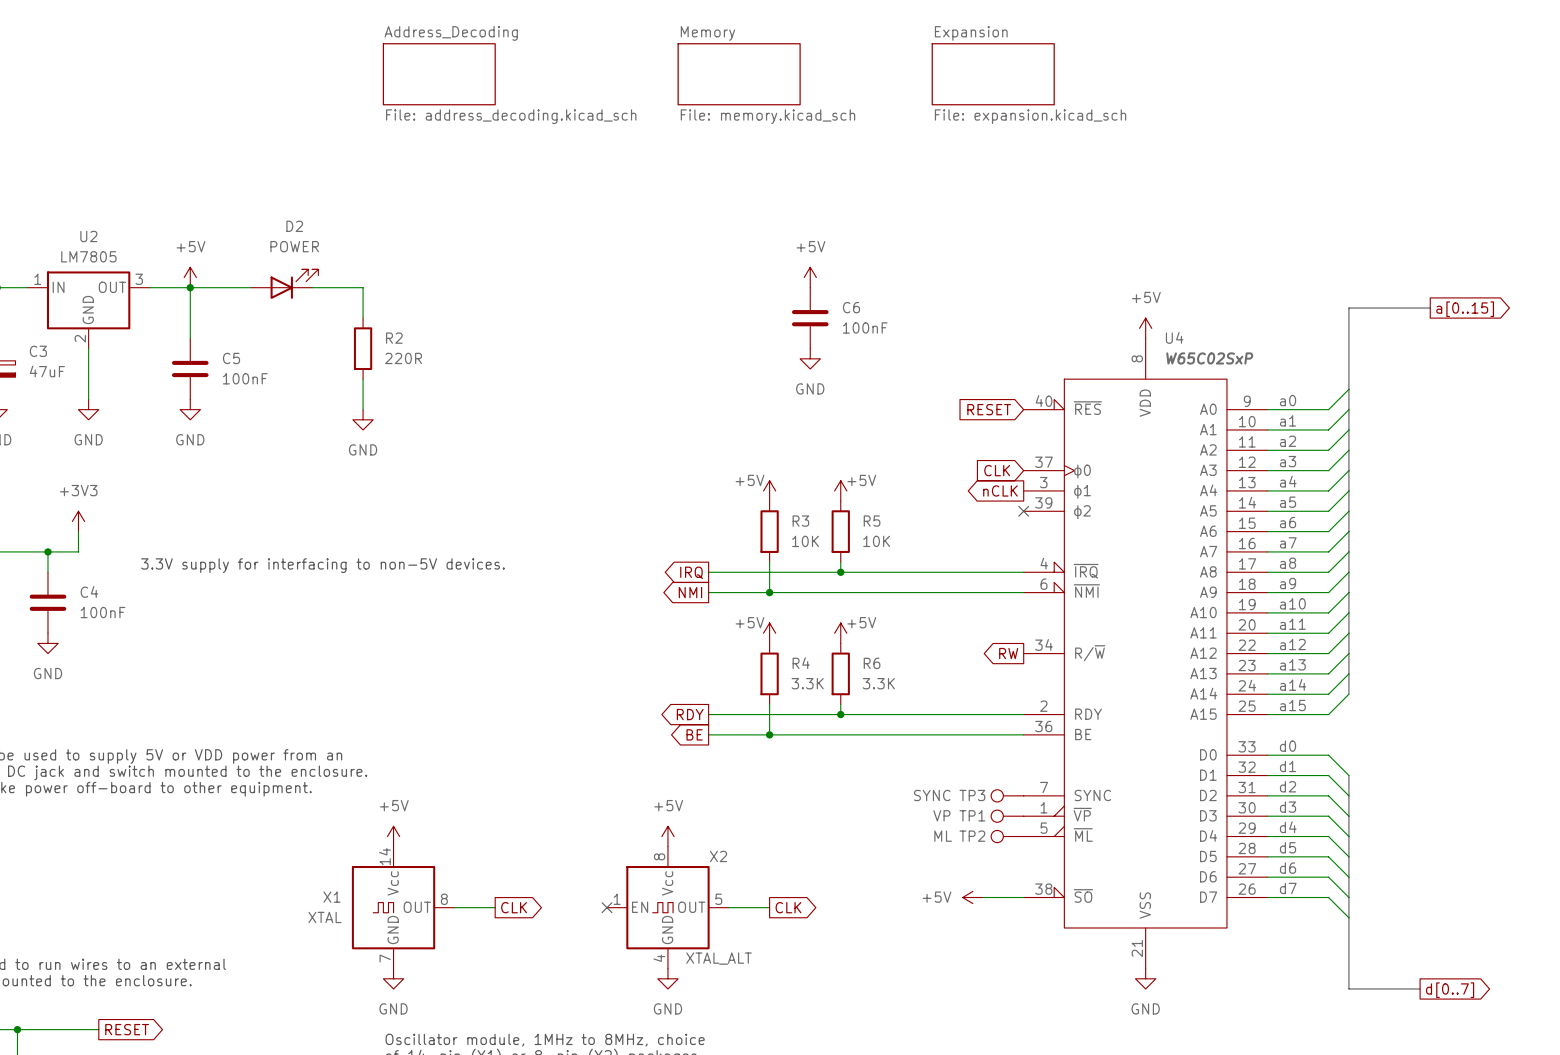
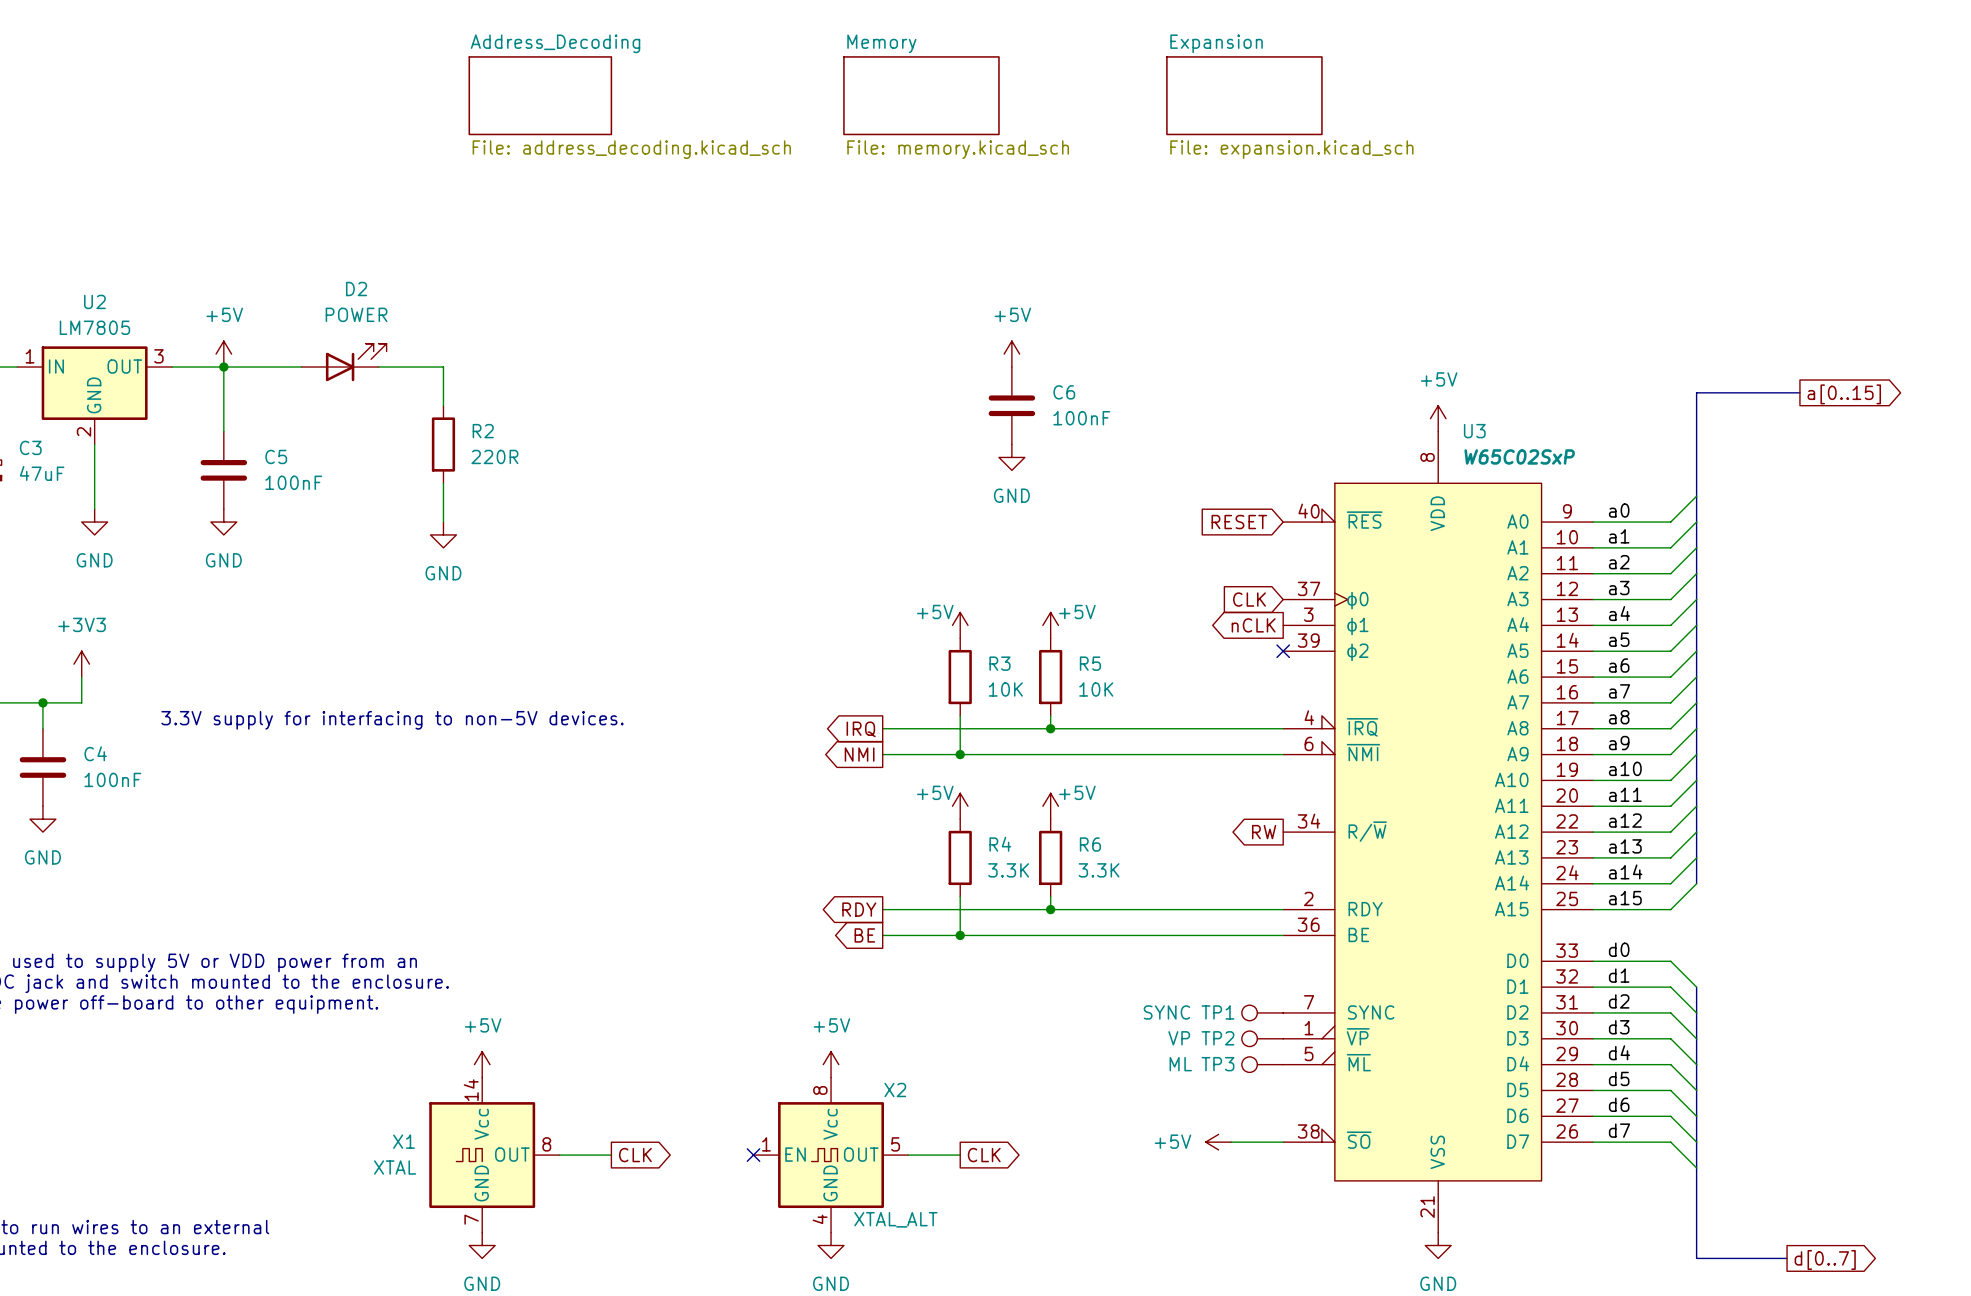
U4 name: U4 (1174, 337) -> U3 (1474, 431)
TP3 name: TP3 (972, 795) -> TP1 (1217, 1012)
TP1 name: TP1 (972, 815) -> TP2 (1217, 1038)
TP2 name: TP2 (972, 836) -> TP3 (1217, 1064)

